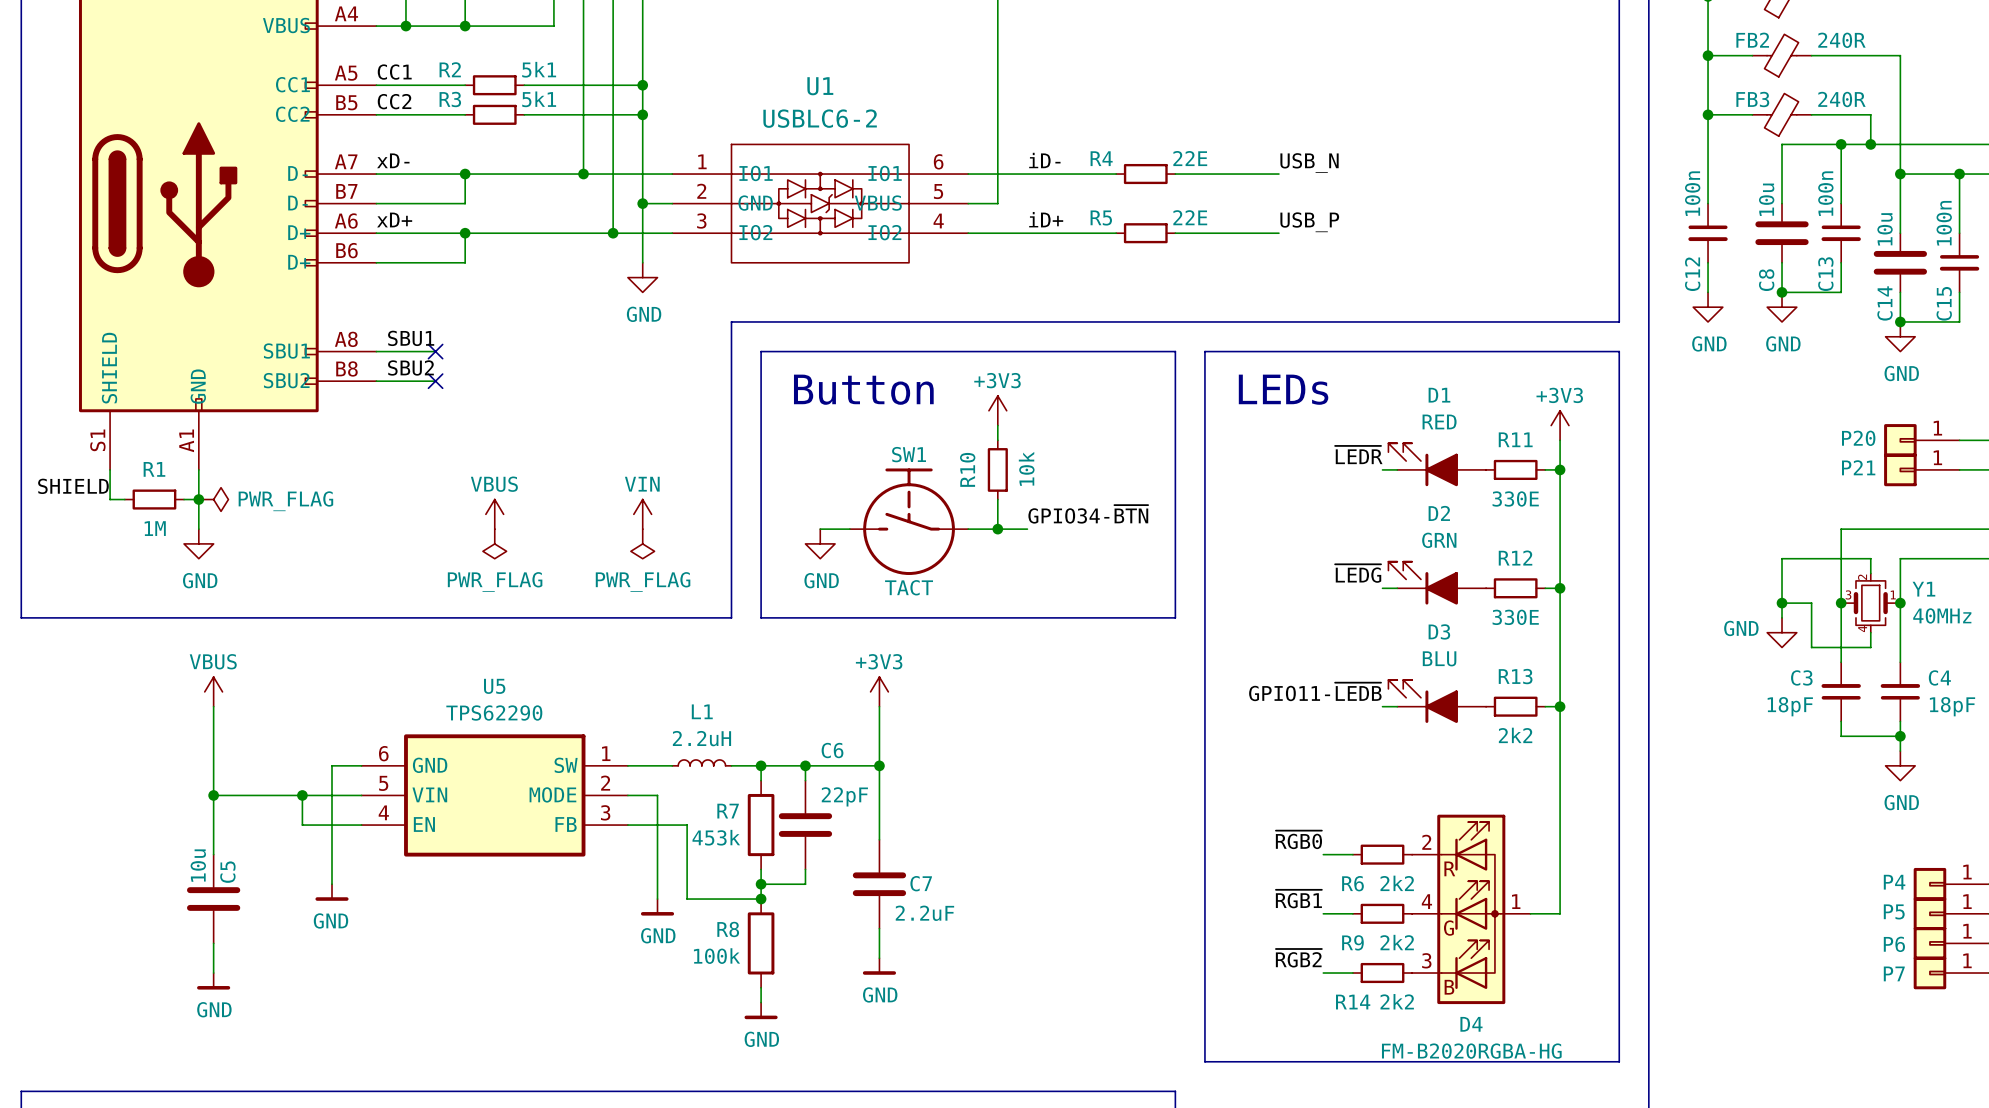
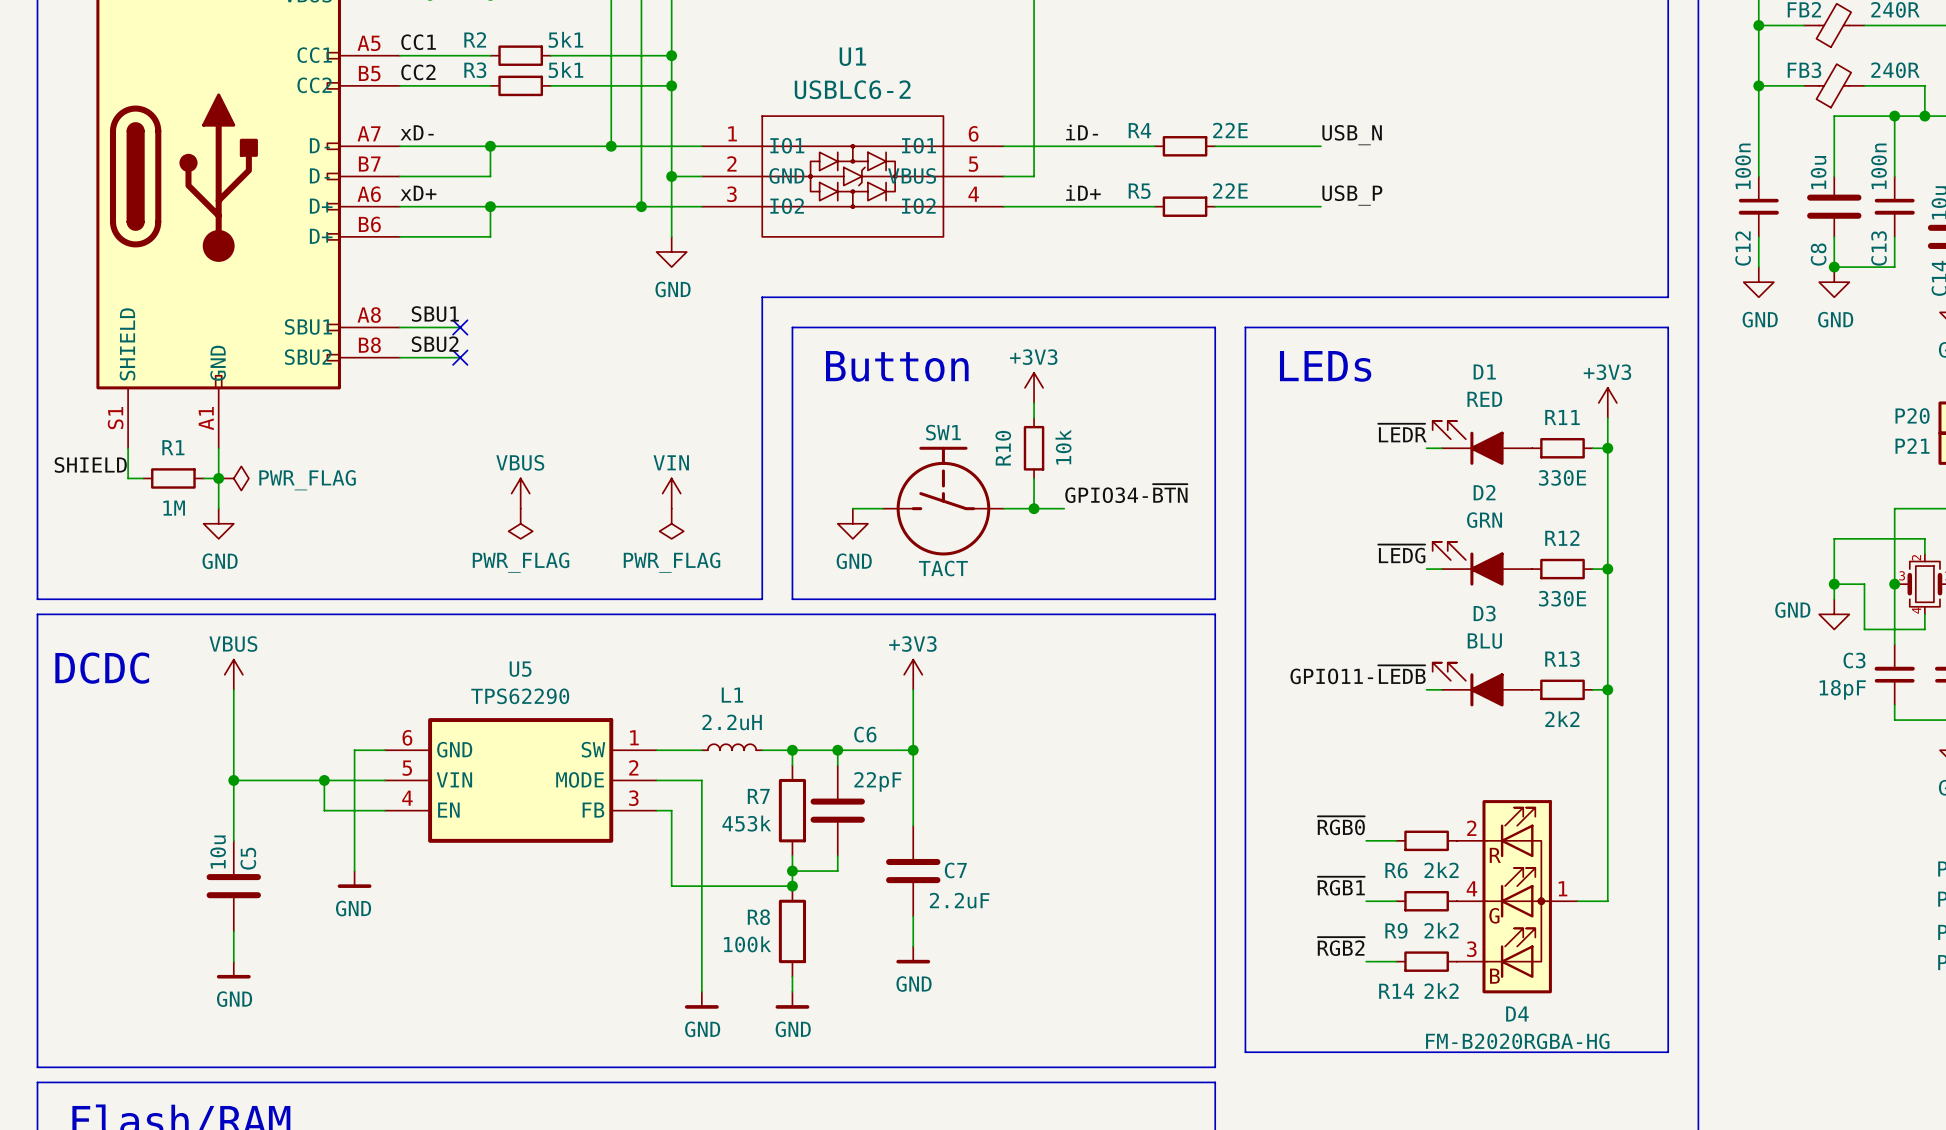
line: none -> (37, 614) (37, 1067) (1215, 1067) (1215, 614) (37, 614)
text: none -> DCDC (102, 668)
wire: (657, 795) (657, 899) -> (686, 780) (701, 780) (701, 991)
wire: (642, 825) (687, 825) (687, 899) -> (671, 810) (671, 886) (716, 886)
power symbol position: GND (657, 907) -> GND (701, 1000)

